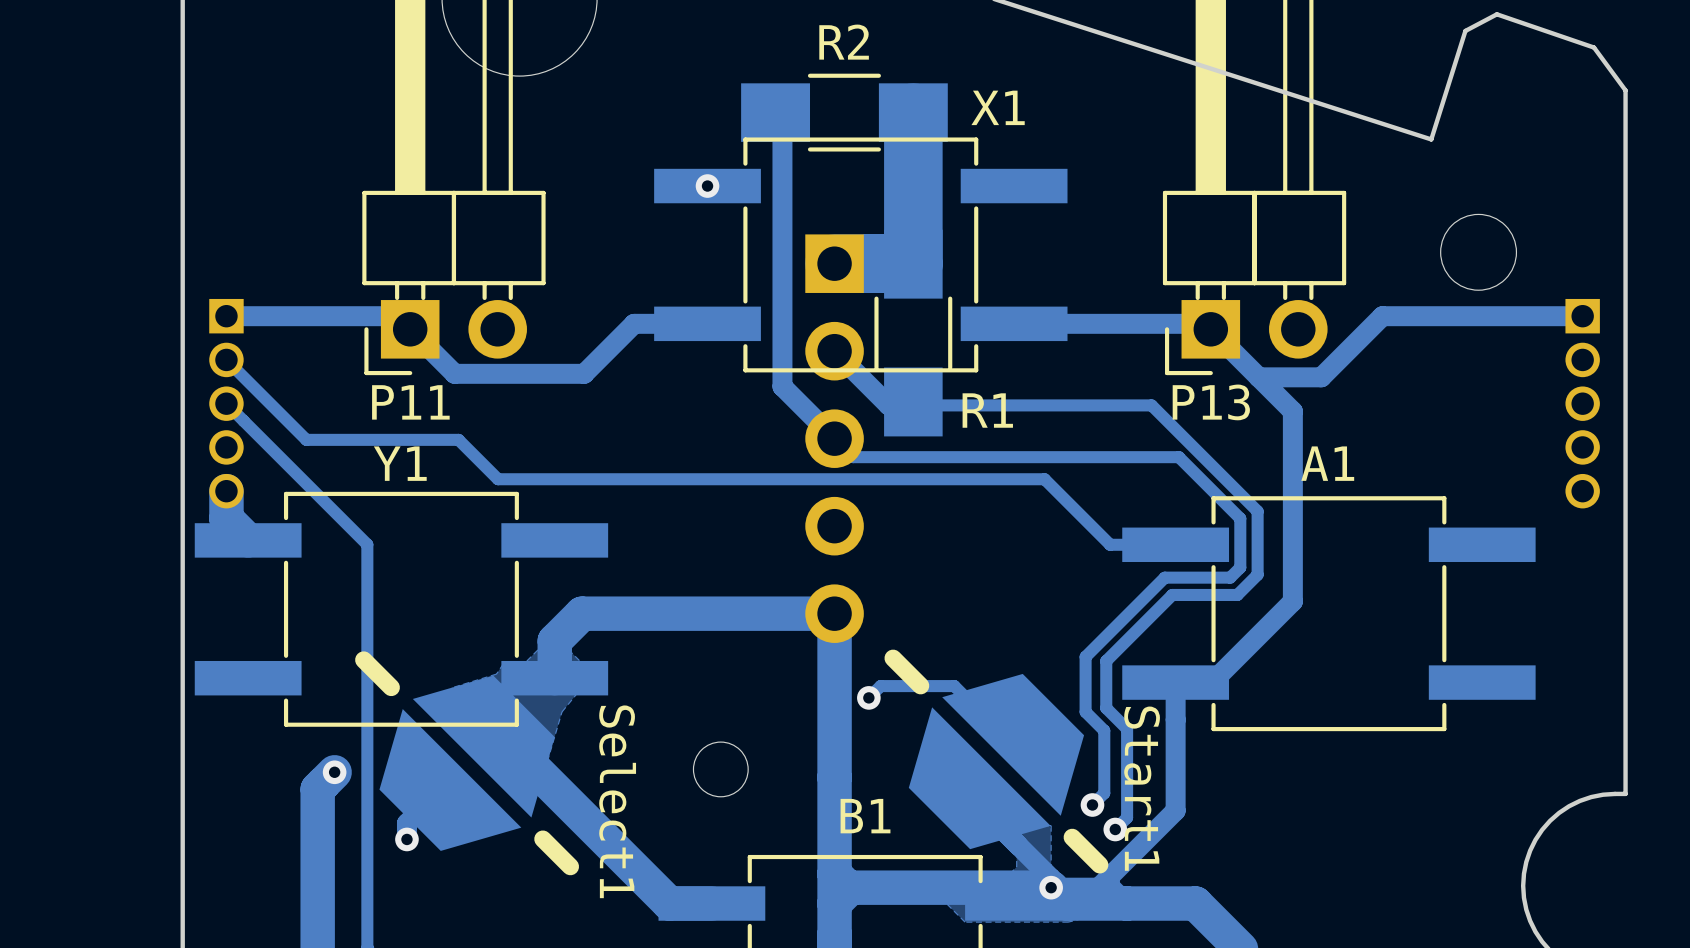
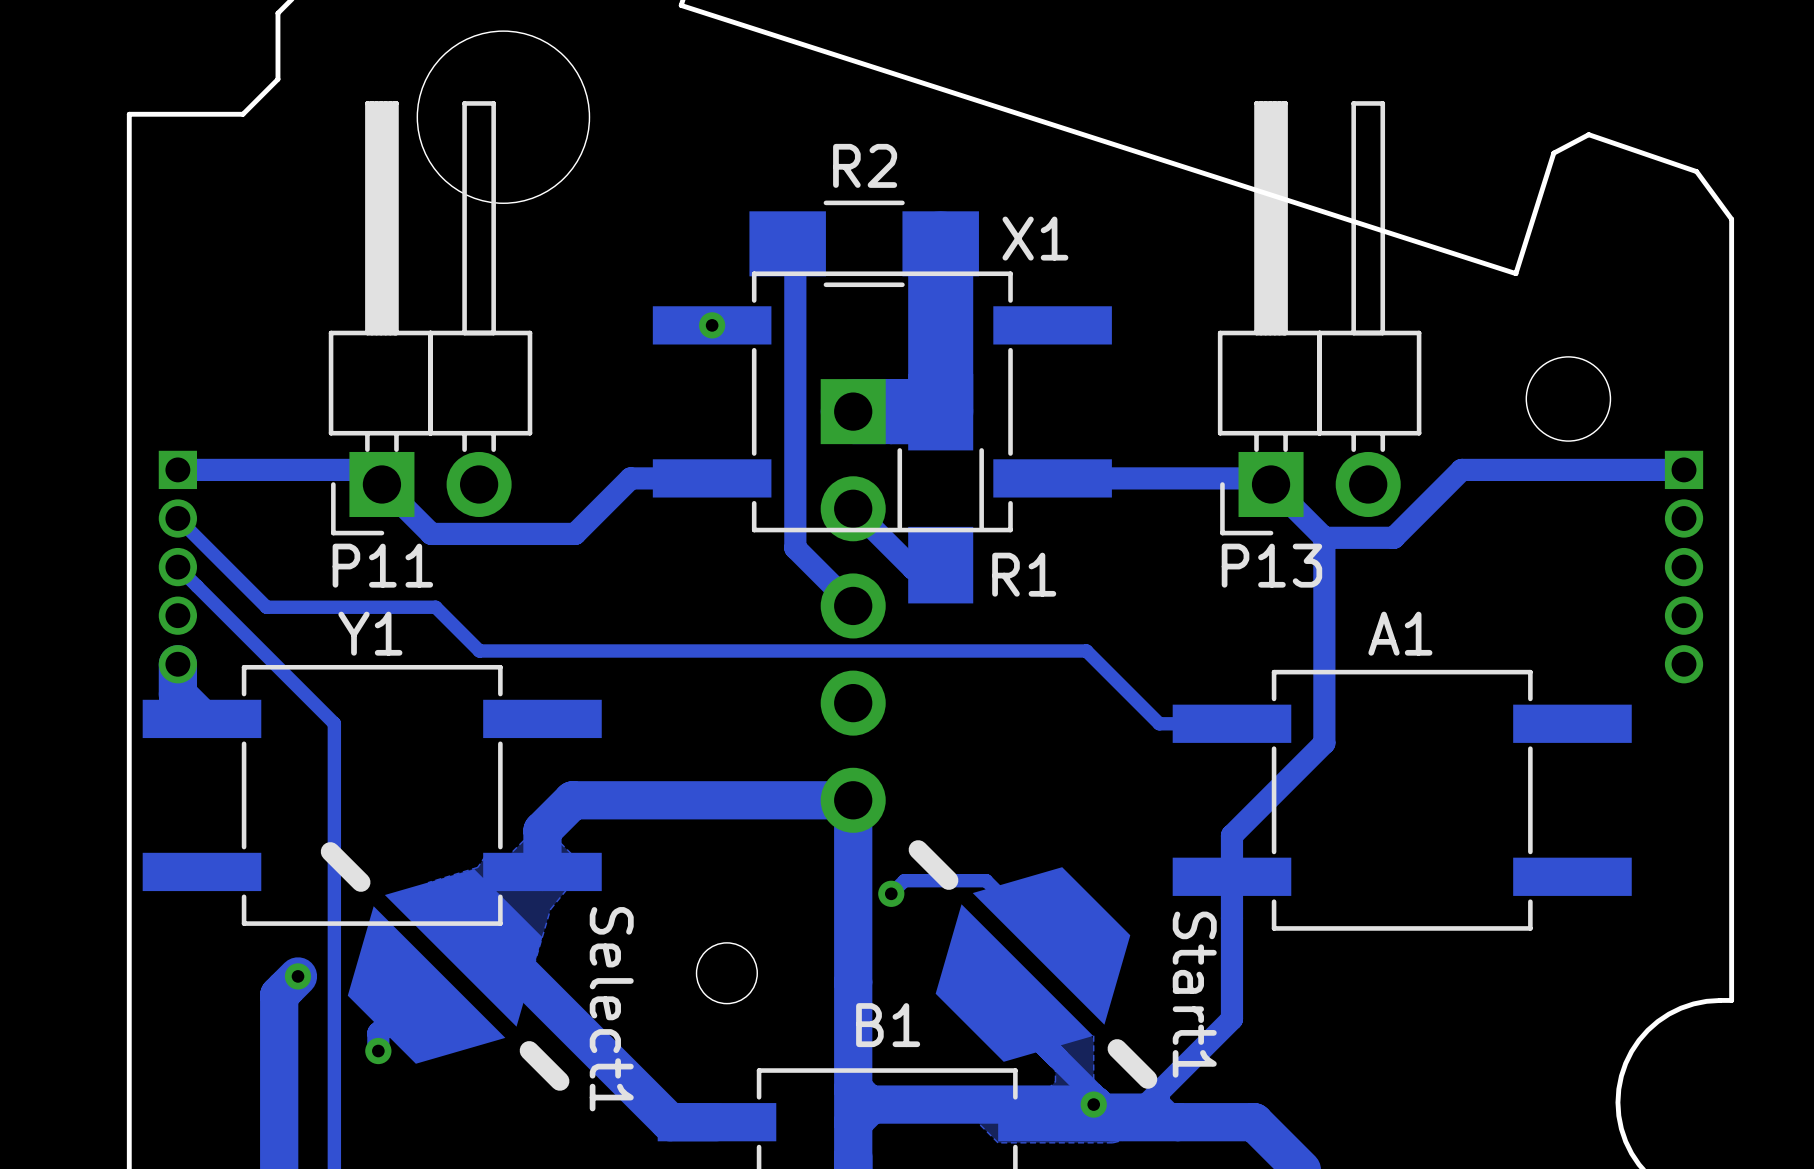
track: (1258, 377) (1292, 411) (1292, 601) (1211, 682) (1175, 682) -> (1324, 537) (1324, 743) (1231, 835) (1231, 876)
track: (913, 405) (1151, 405) (1257, 511) (1257, 574) (1237, 594) (1172, 594) (1106, 661) (1106, 708) (1127, 729) (1127, 817) (1115, 829) -> none
track: (834, 438) (853, 457) (1178, 457) (1240, 518) (1240, 567) (1230, 577) (1164, 577) (1085, 656) (1085, 711) (1104, 730) (1104, 793) (1092, 805) -> none
via: (1092, 805) -> none
via: (1115, 829) -> none

